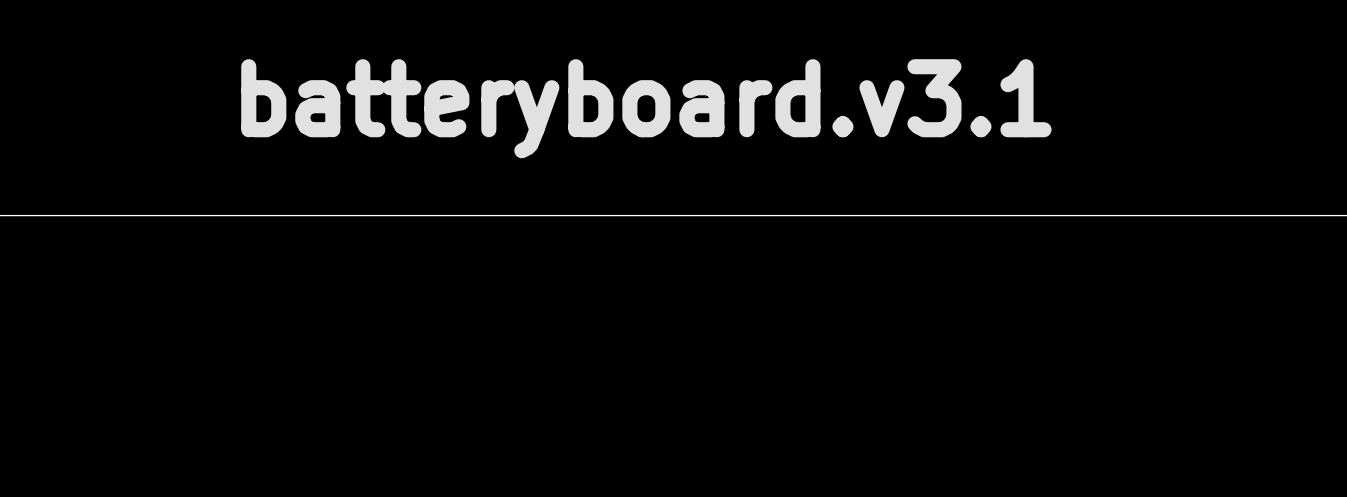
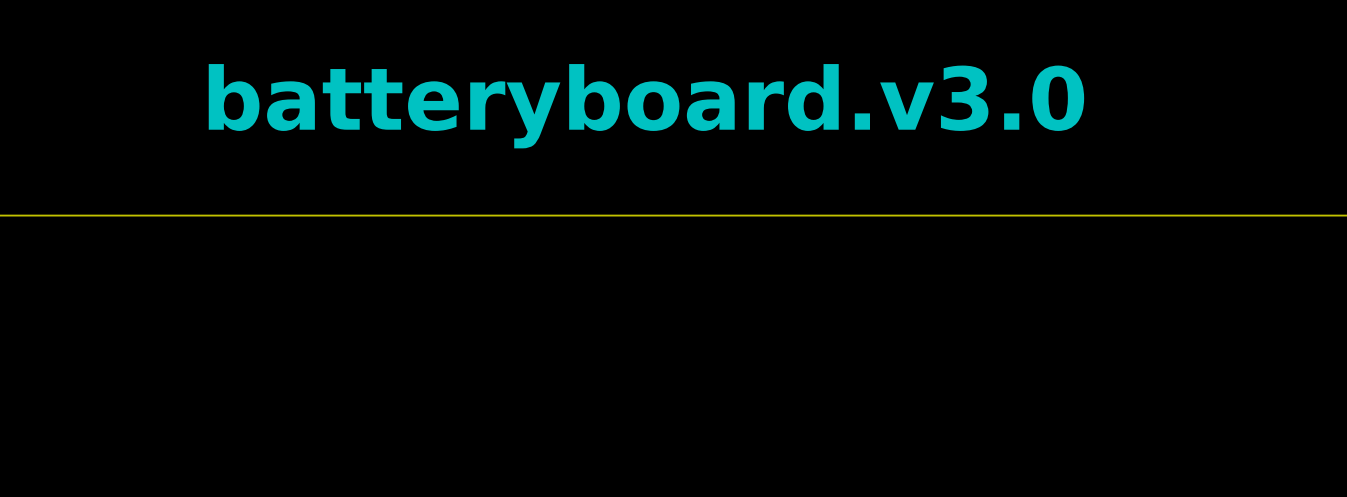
text: batteryboard.v3.1 (646, 108) -> batteryboard.v3.0 (646, 106)

